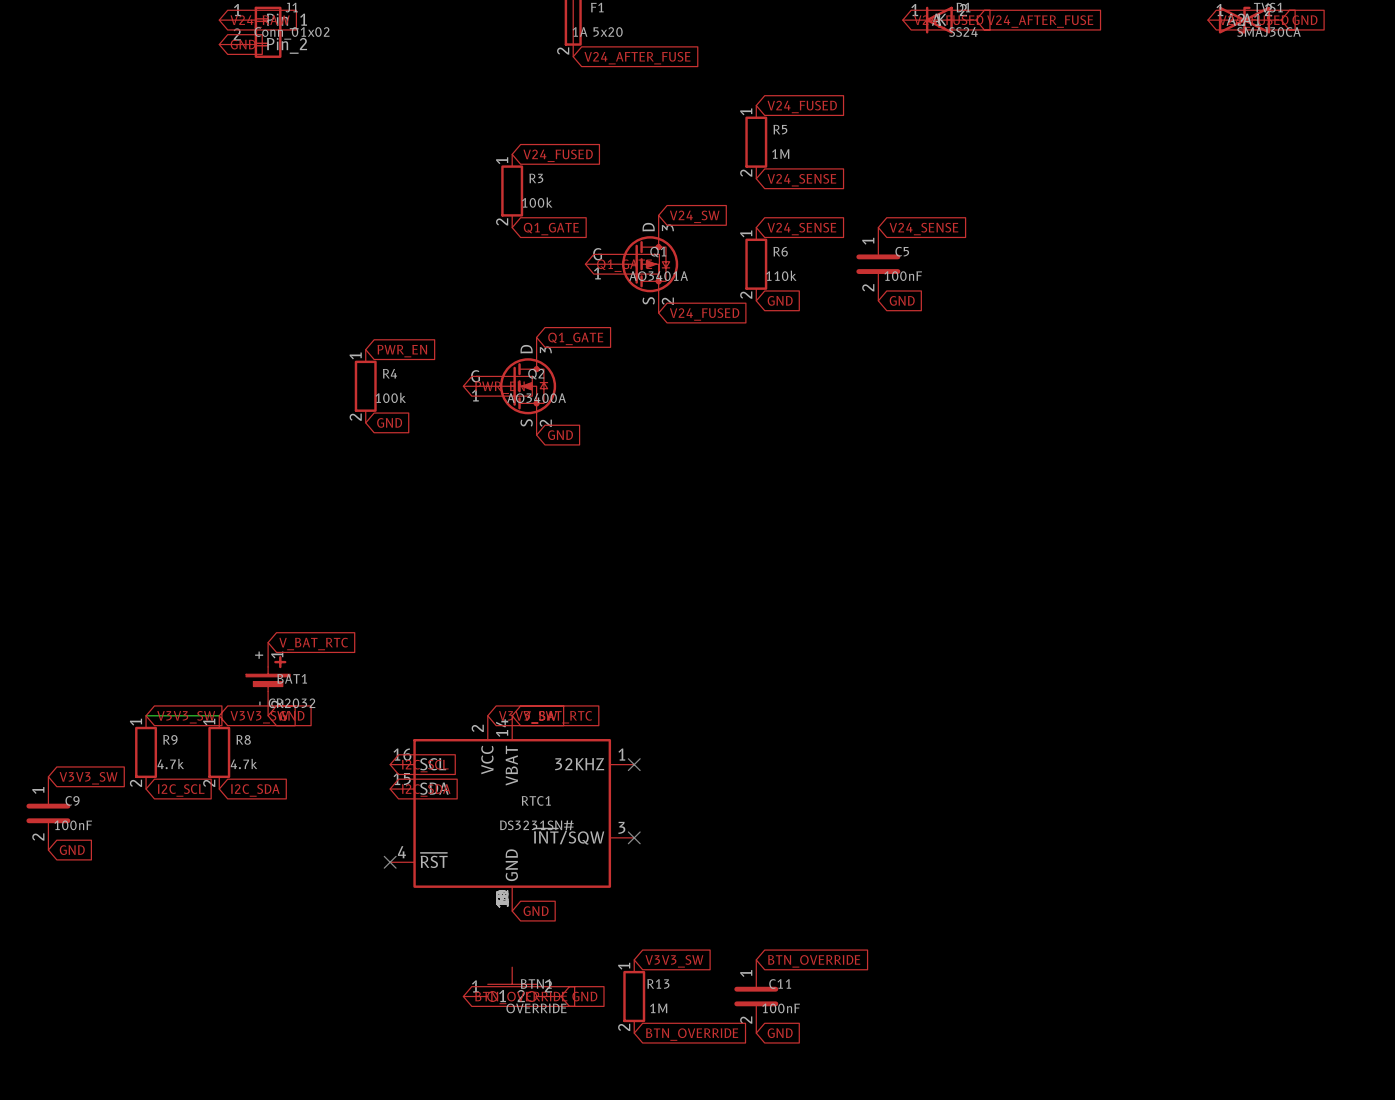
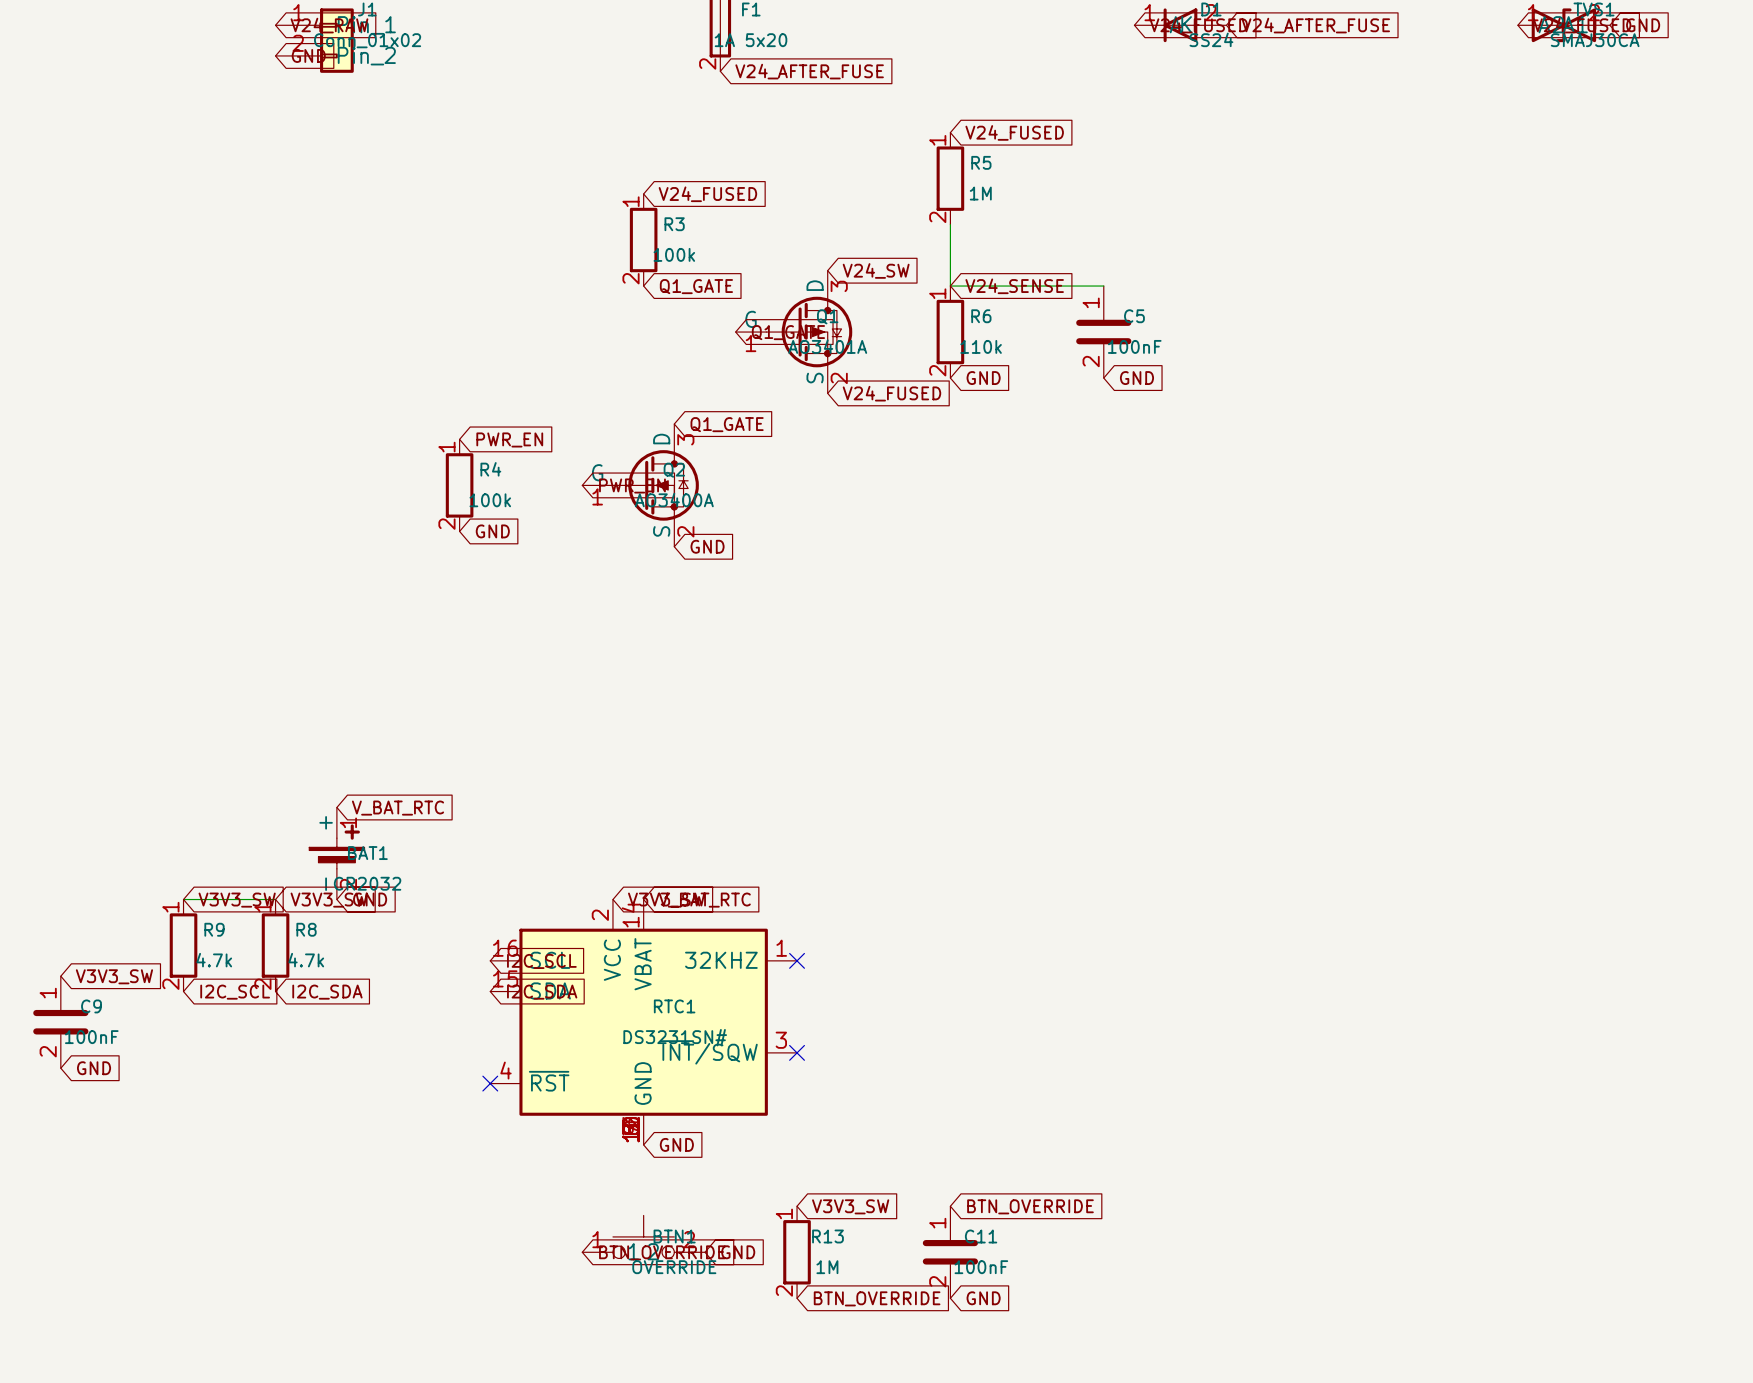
wire: none -> (950, 224) (950, 286) (1103, 286)
global label: V24_SENSE (801, 180) -> none
global label: V24_SENSE (923, 229) -> none

